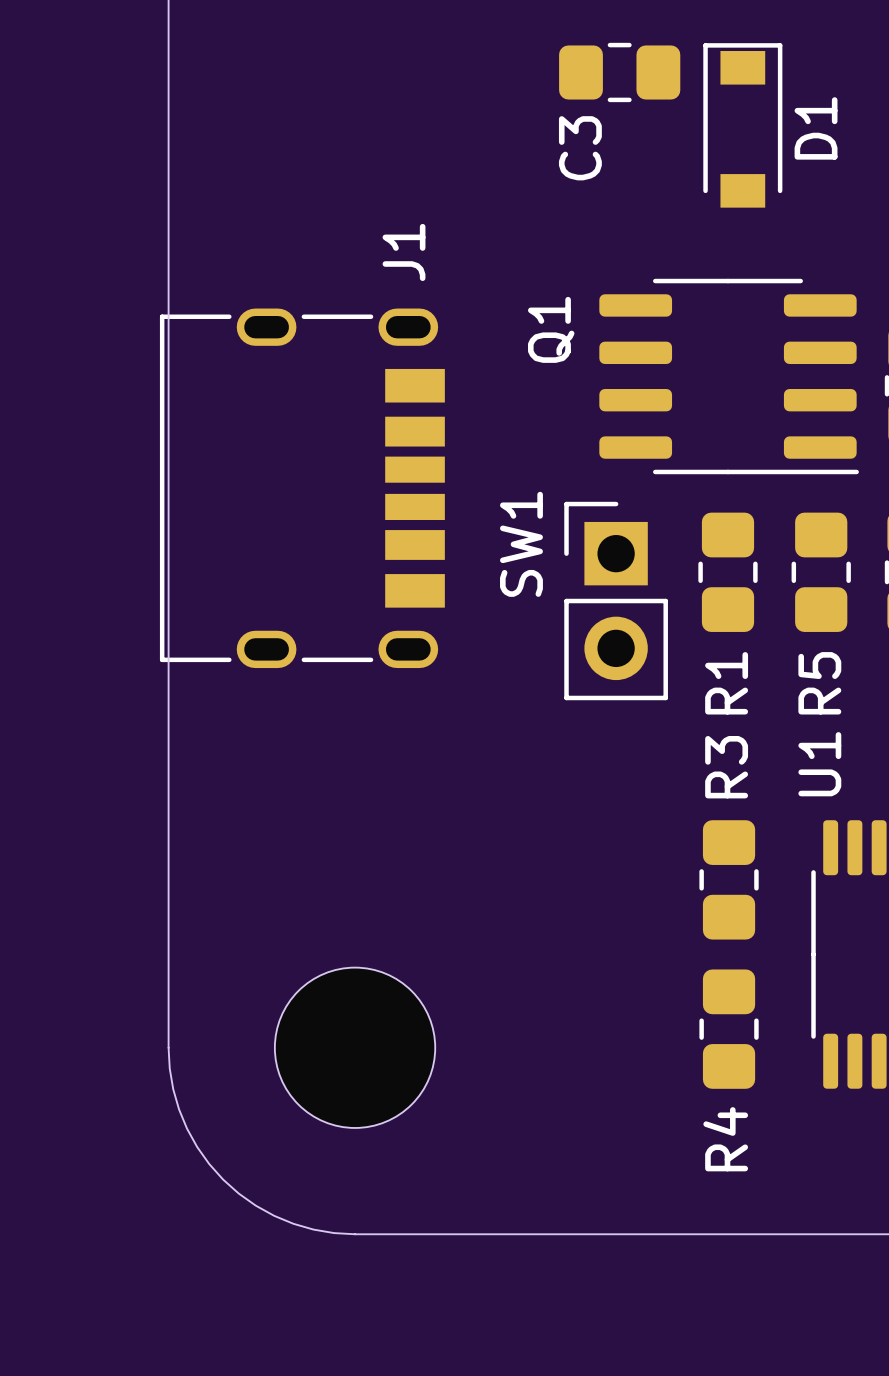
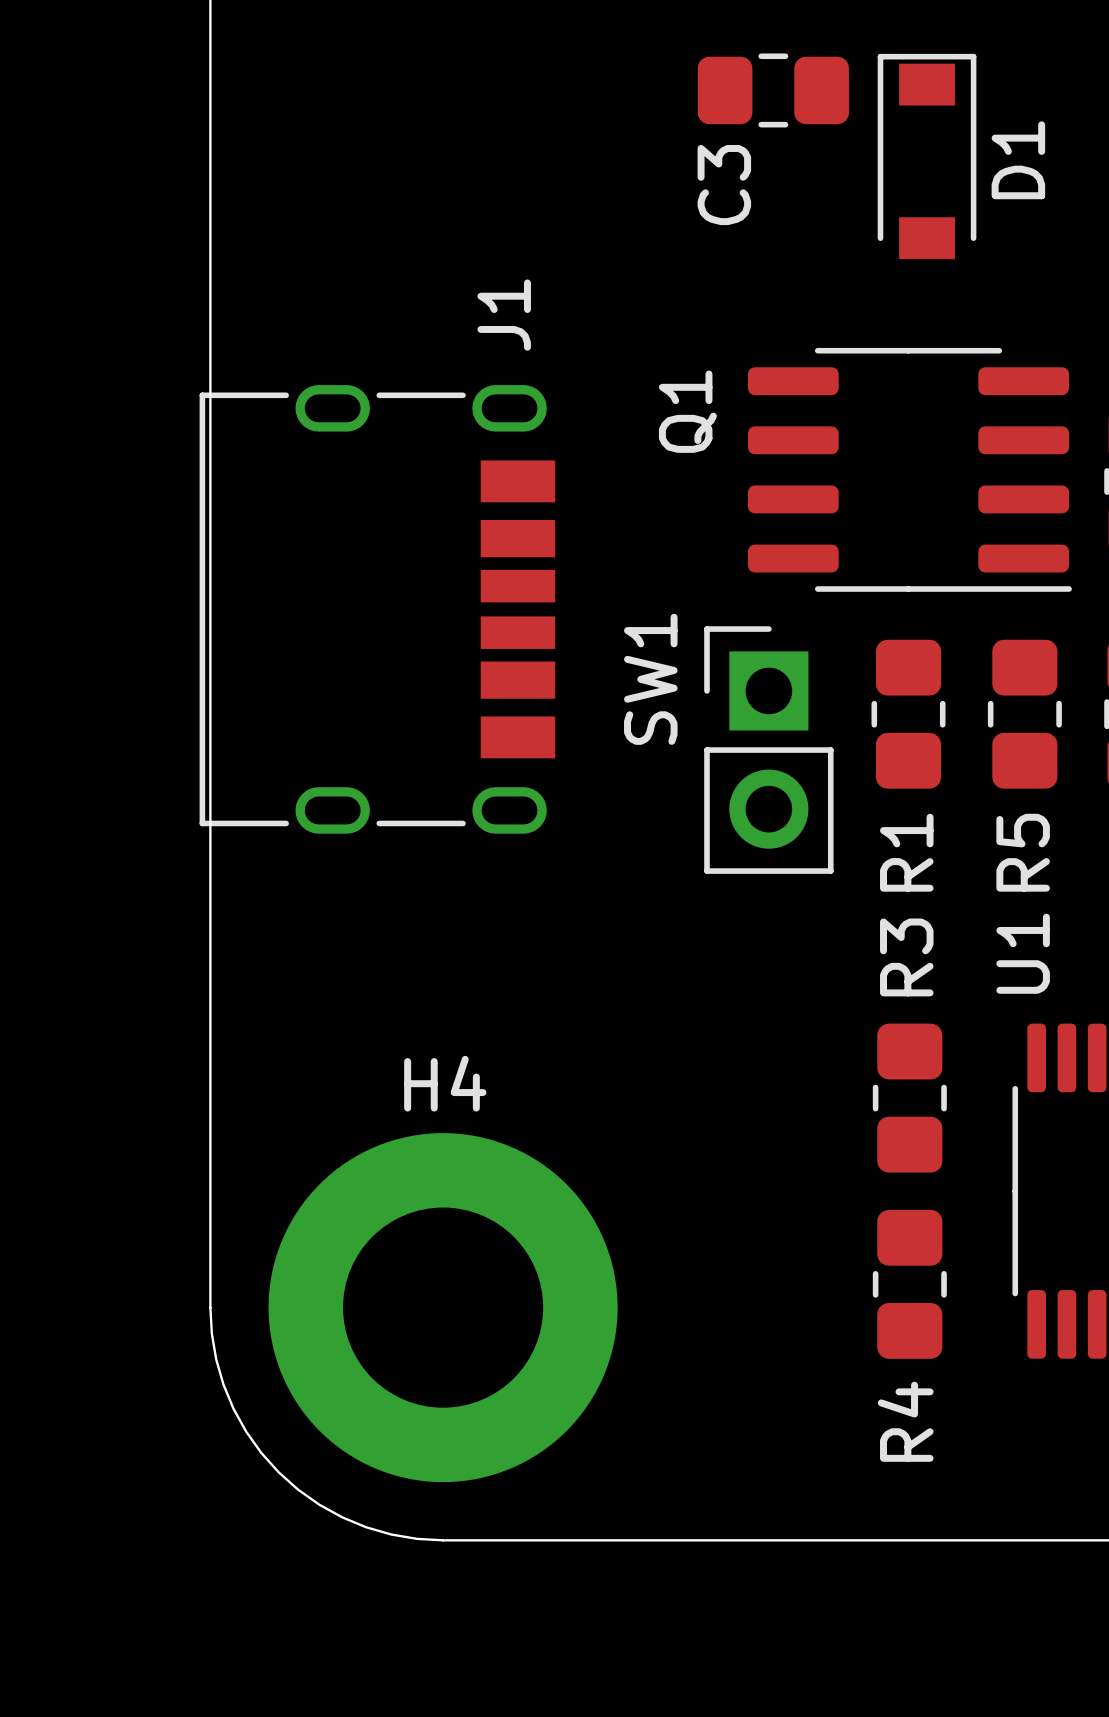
part: (355, 1047) -> none
H4: none -> (443, 1307)

